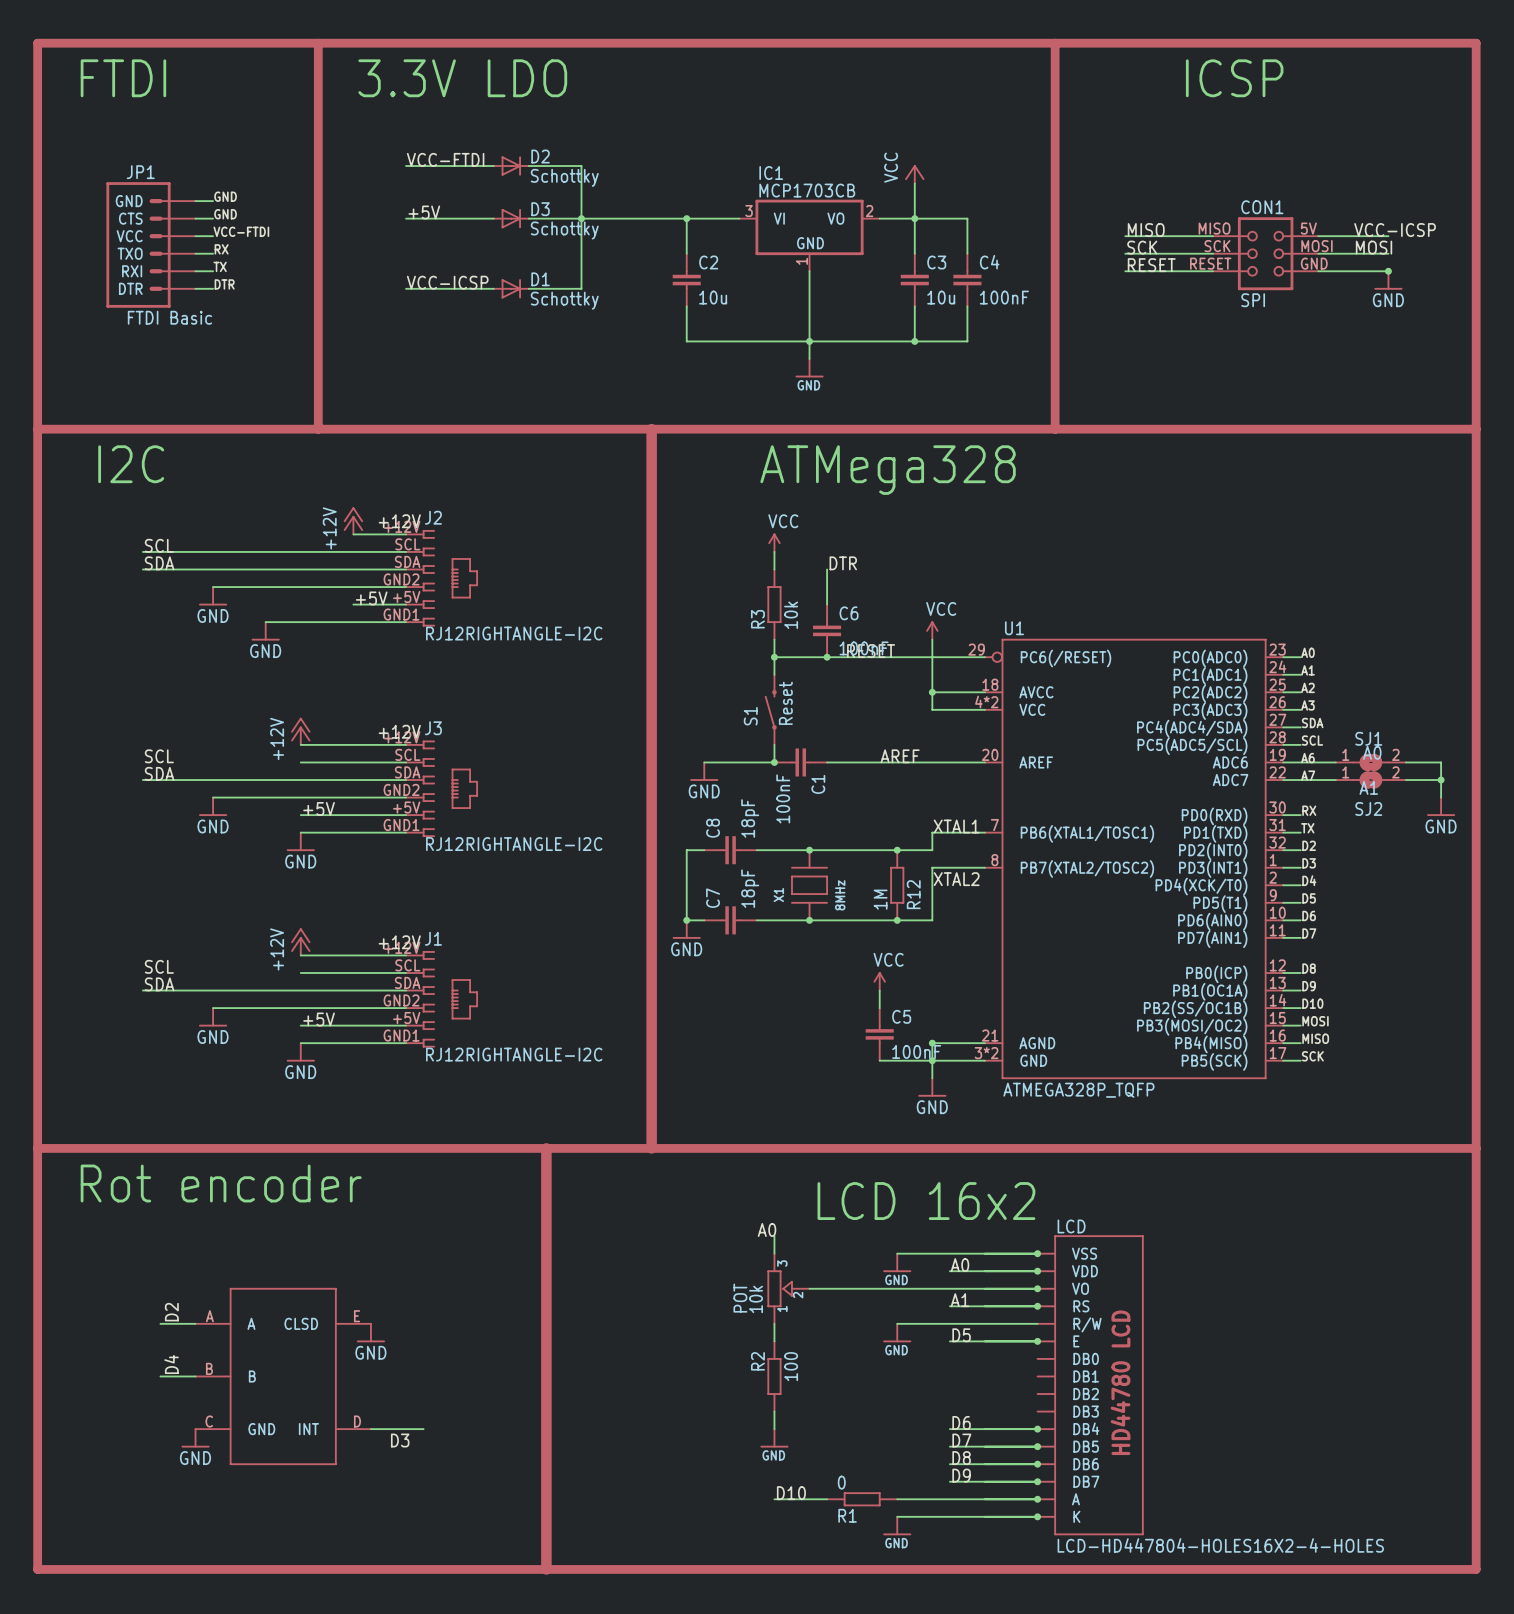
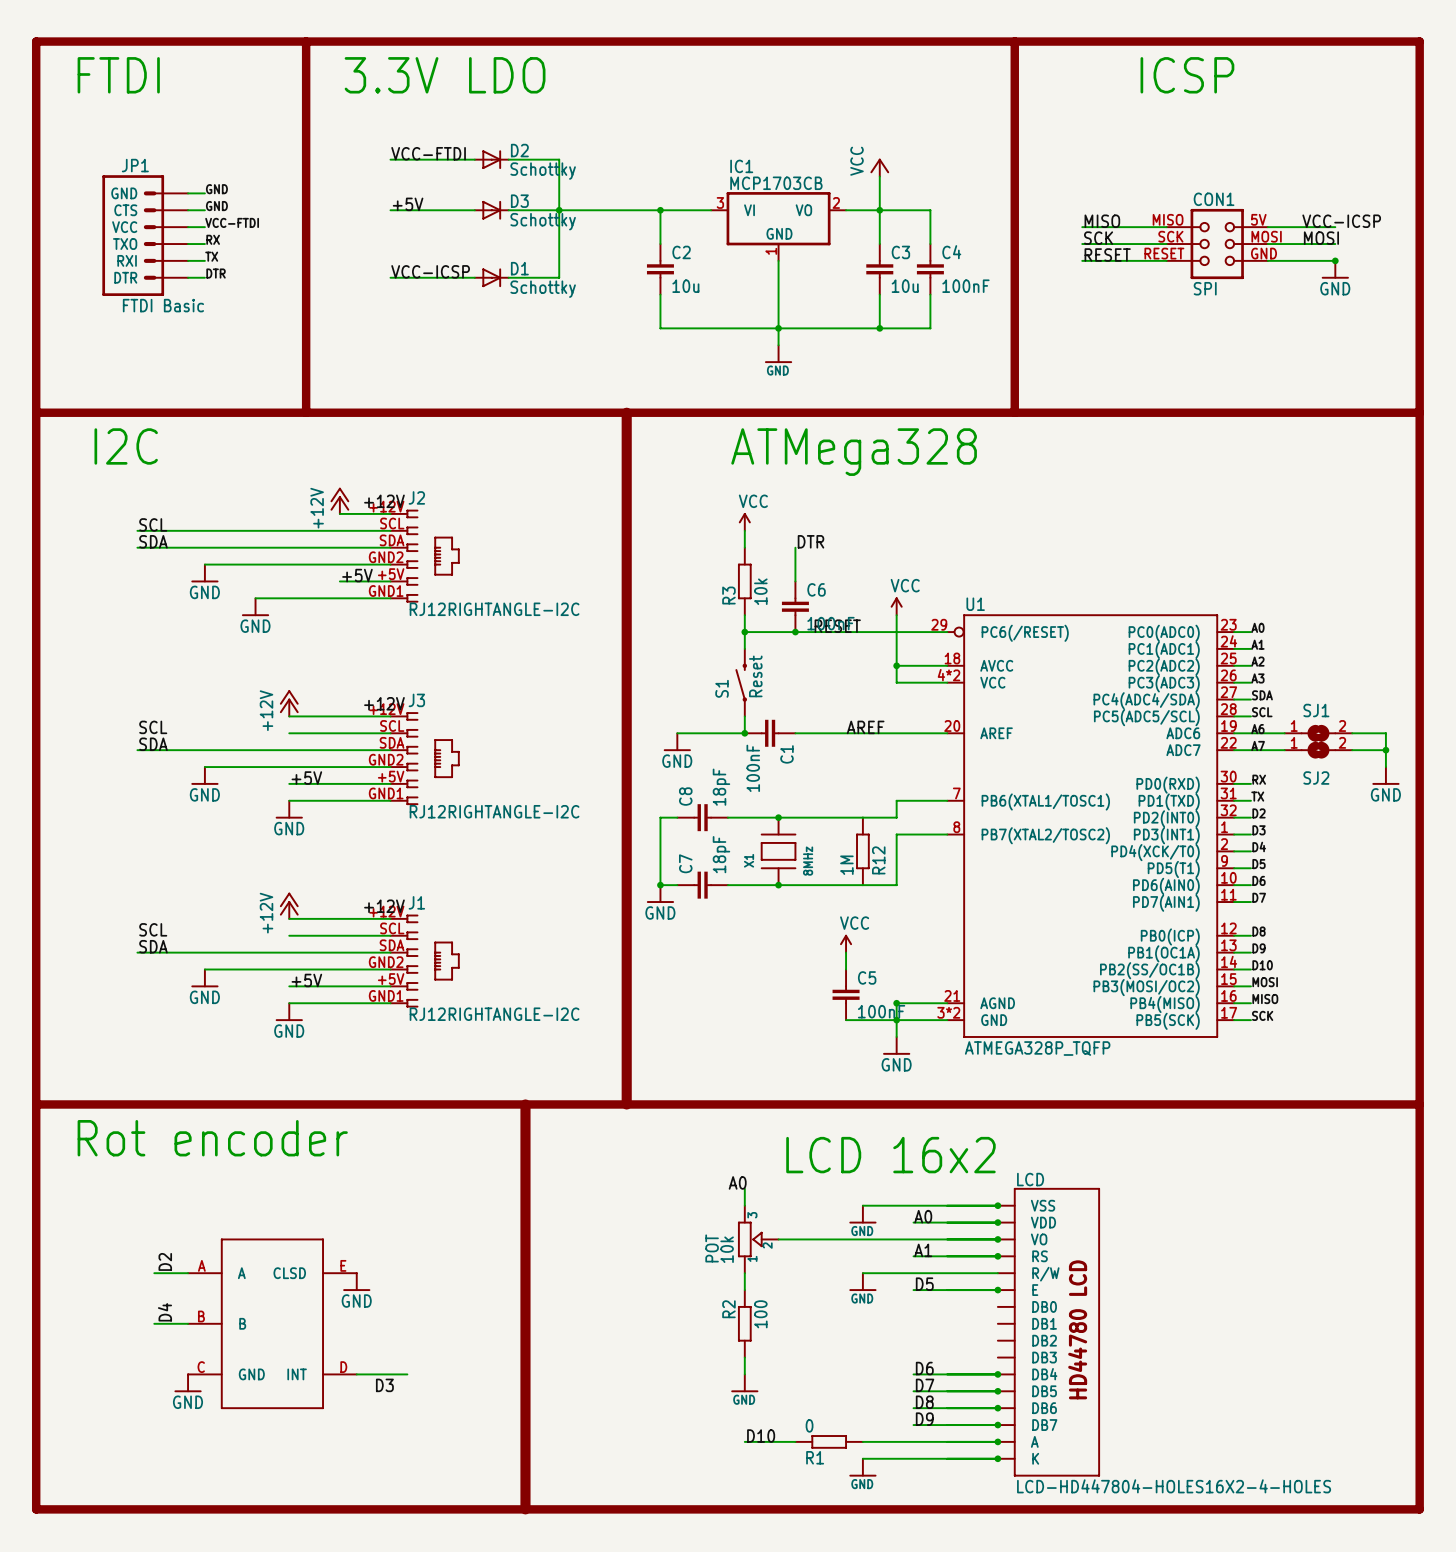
SJ1 value: A0 (1372, 752) -> none
SJ2 value: A1 (1368, 787) -> none
label: XTAL1 (956, 826) -> none
junction: (897, 850) -> none
label: XTAL2 (956, 879) -> none
junction: (897, 920) -> none

